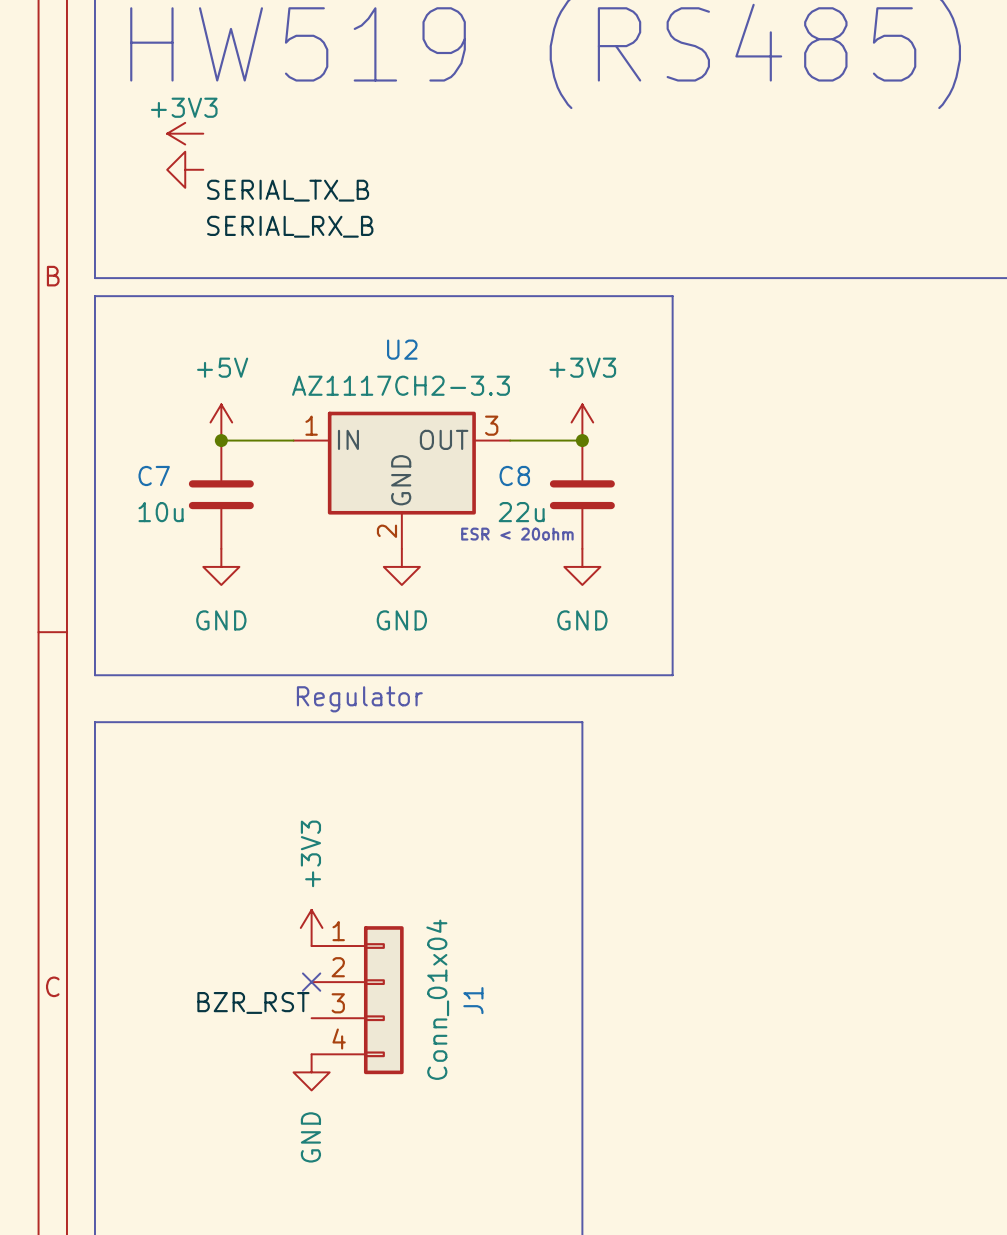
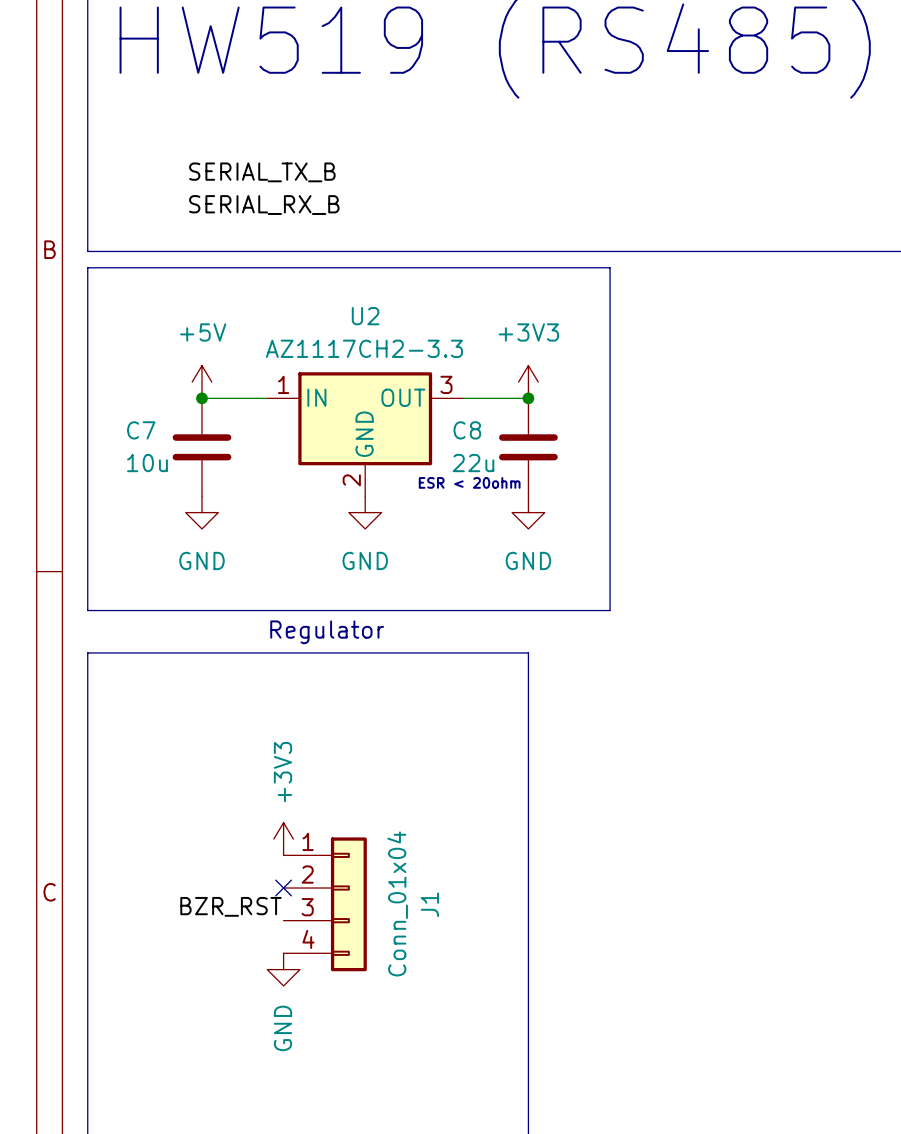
power symbol: +3V3 (185, 133) -> none
power symbol: (185, 169) -> none

